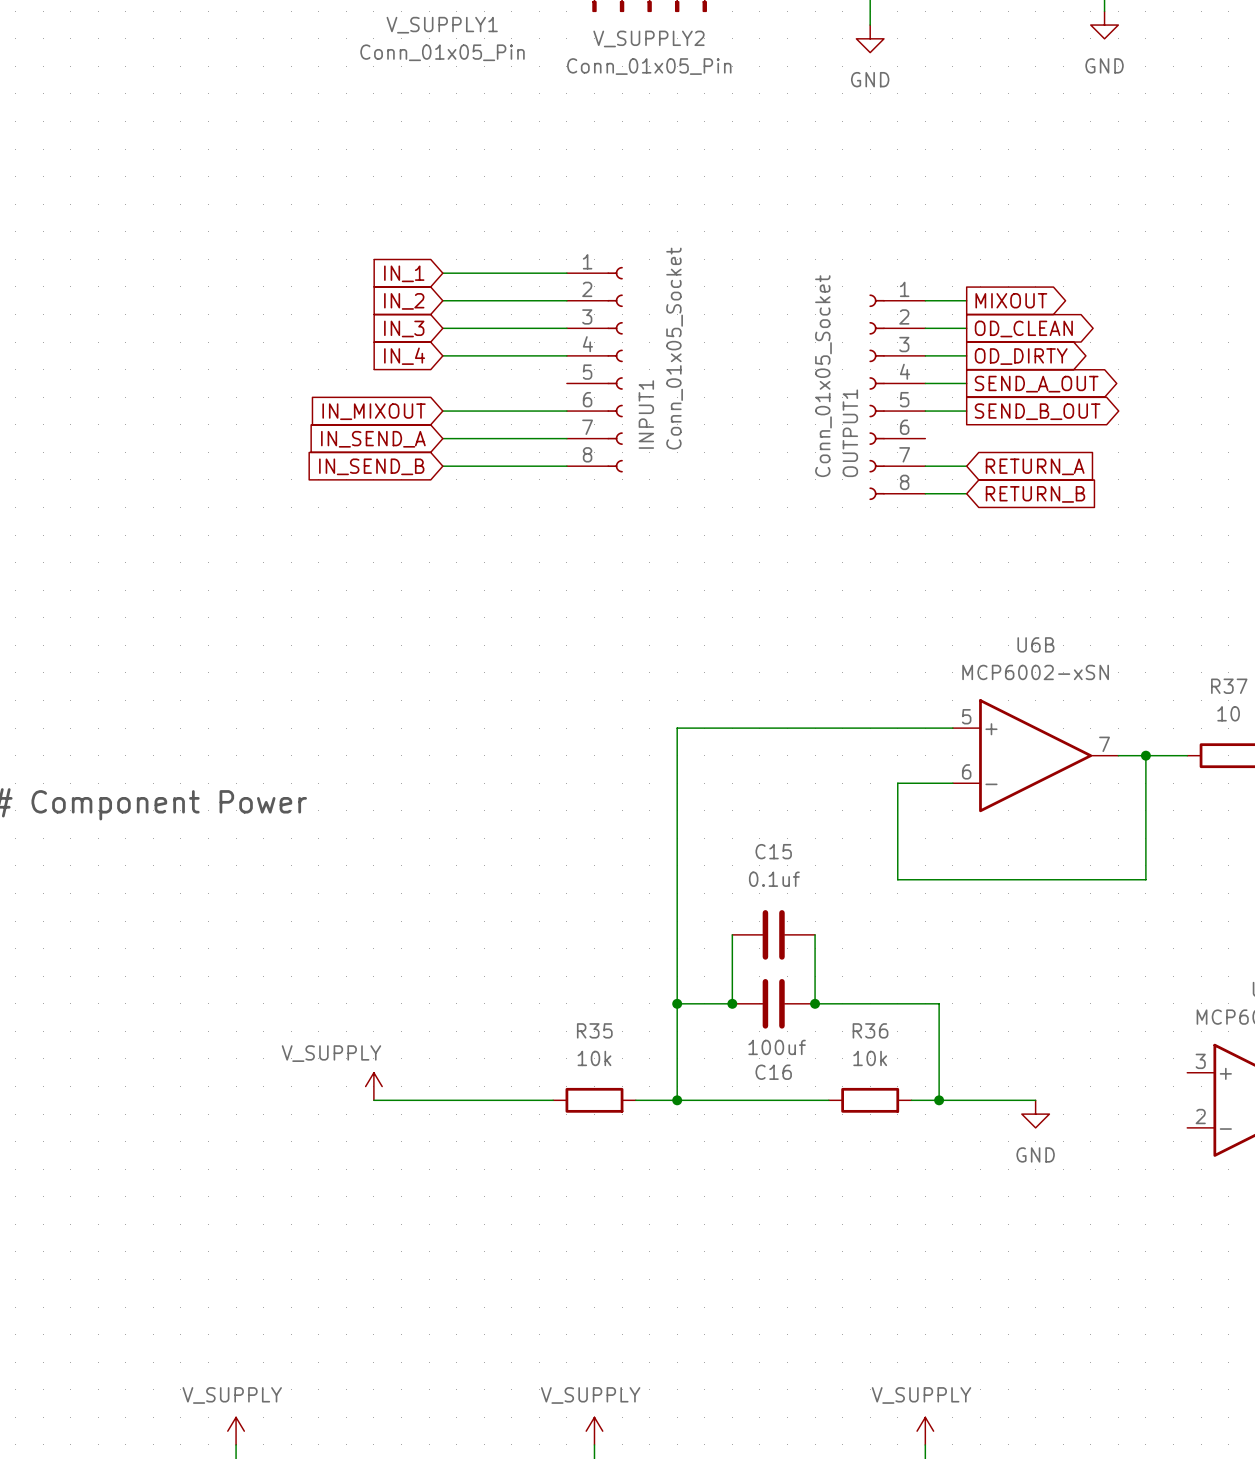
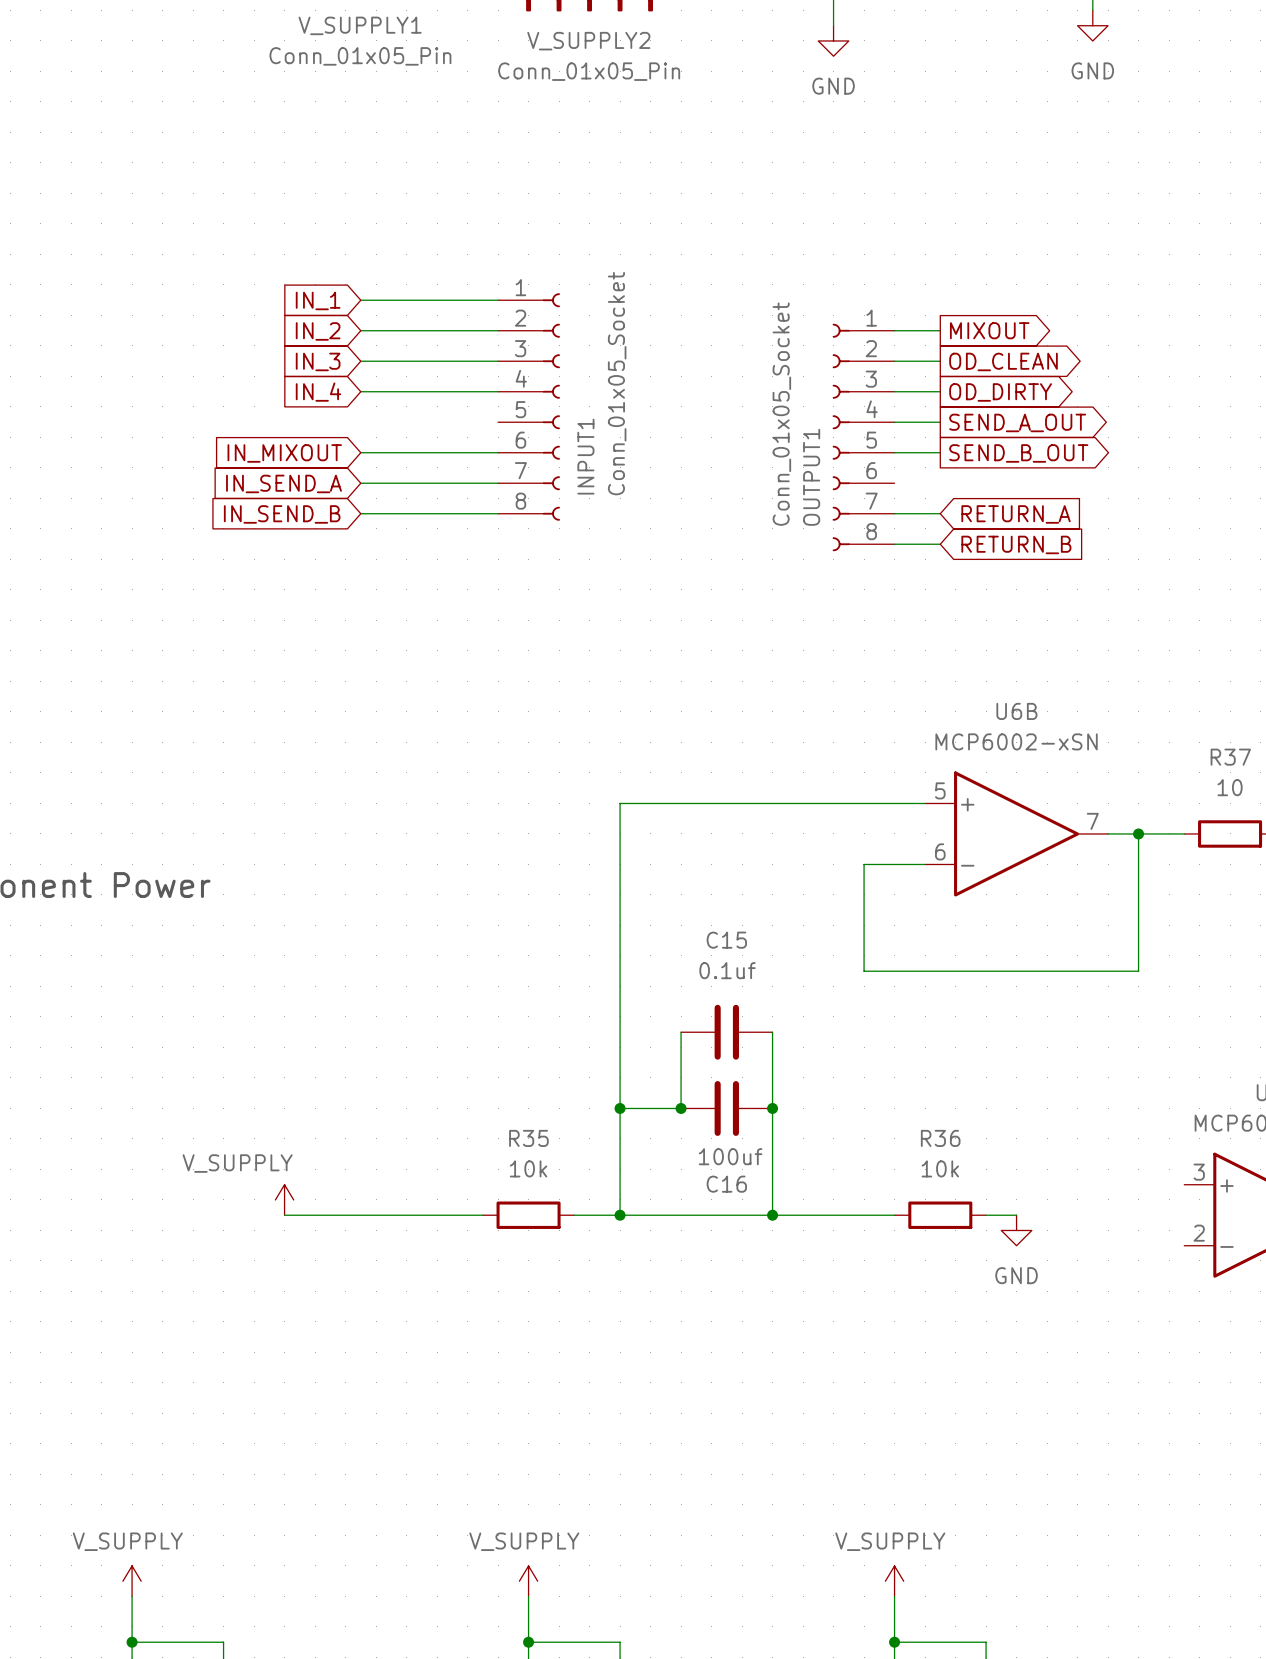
wire: (815, 1003) (939, 1003) (939, 1100) -> (772, 1108) (772, 1215)
junction: none -> (772, 1215)
R36 position: (870, 1100) -> (940, 1215)
wire: (925, 1100) (1008, 1100) -> (787, 1215) (879, 1215)
junction: (939, 1100) -> none

